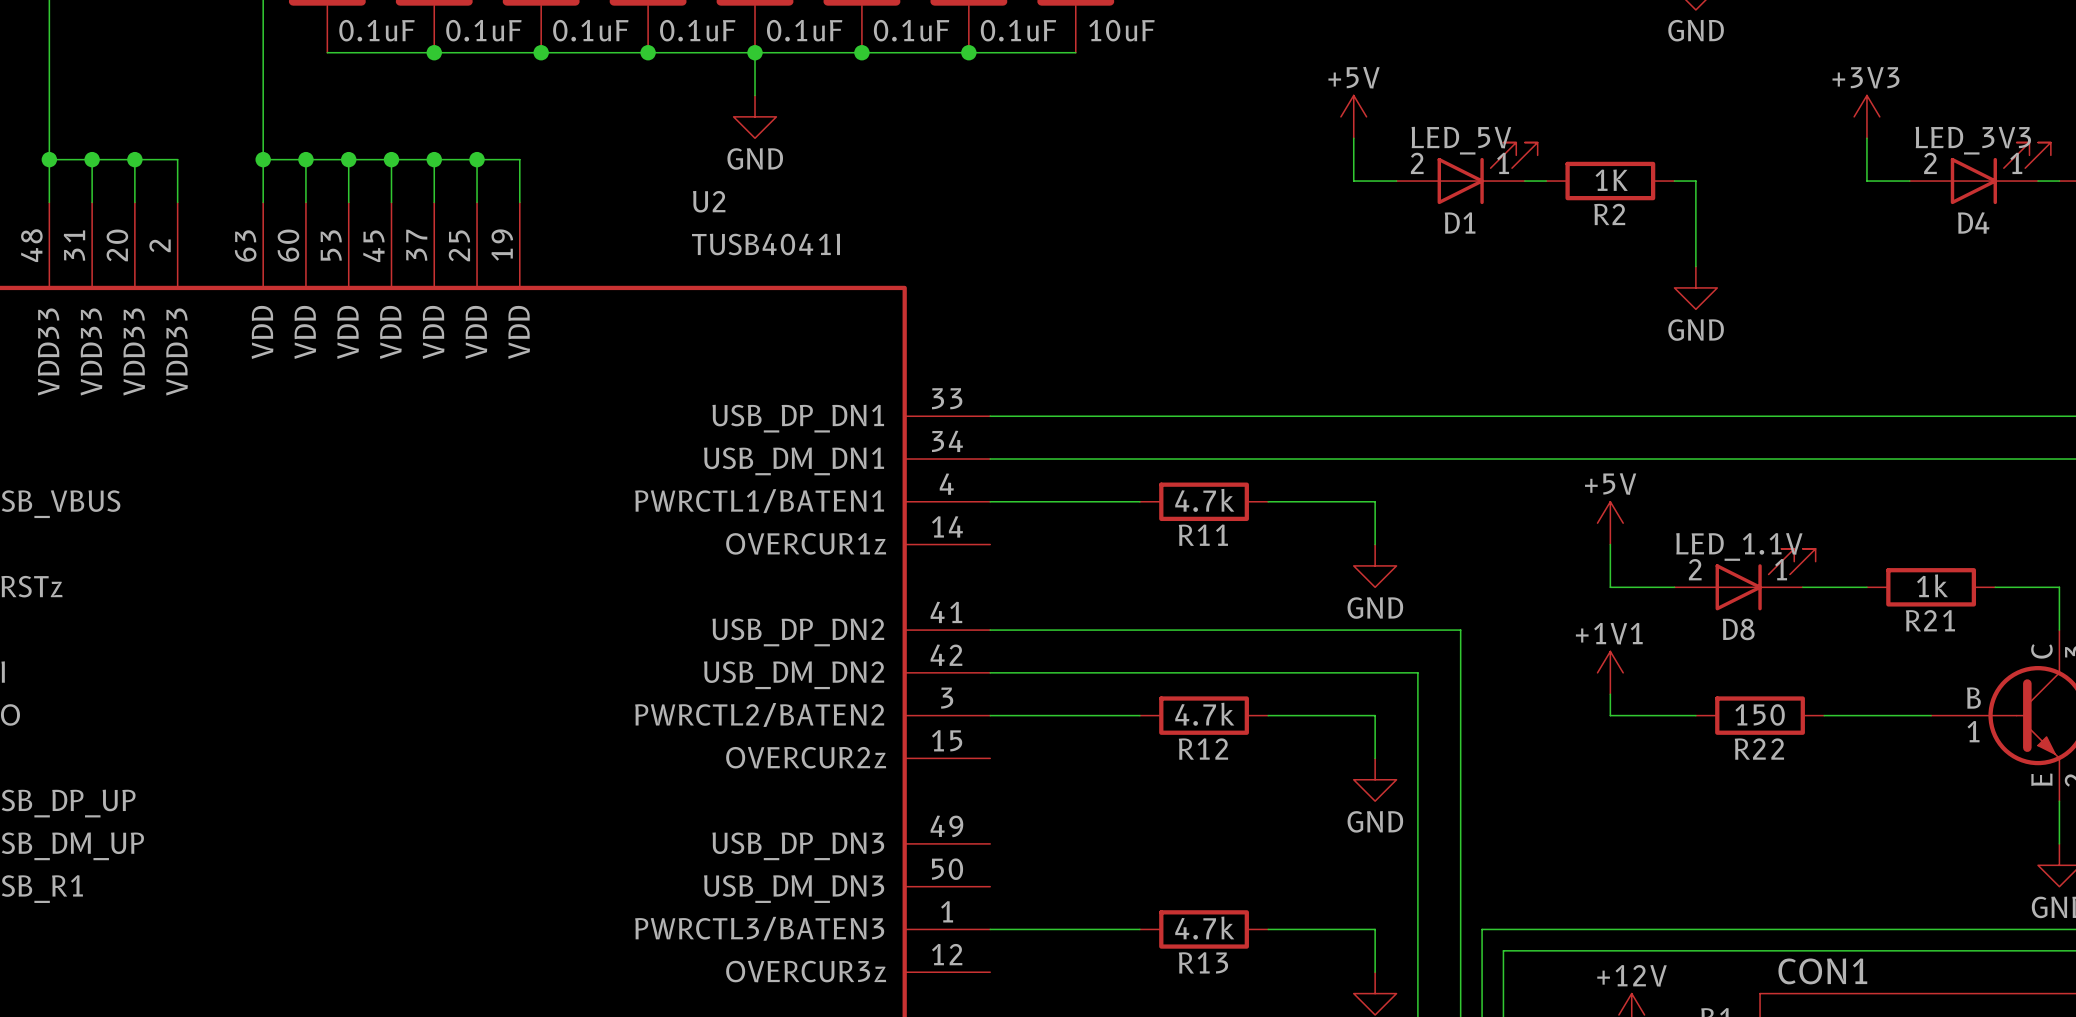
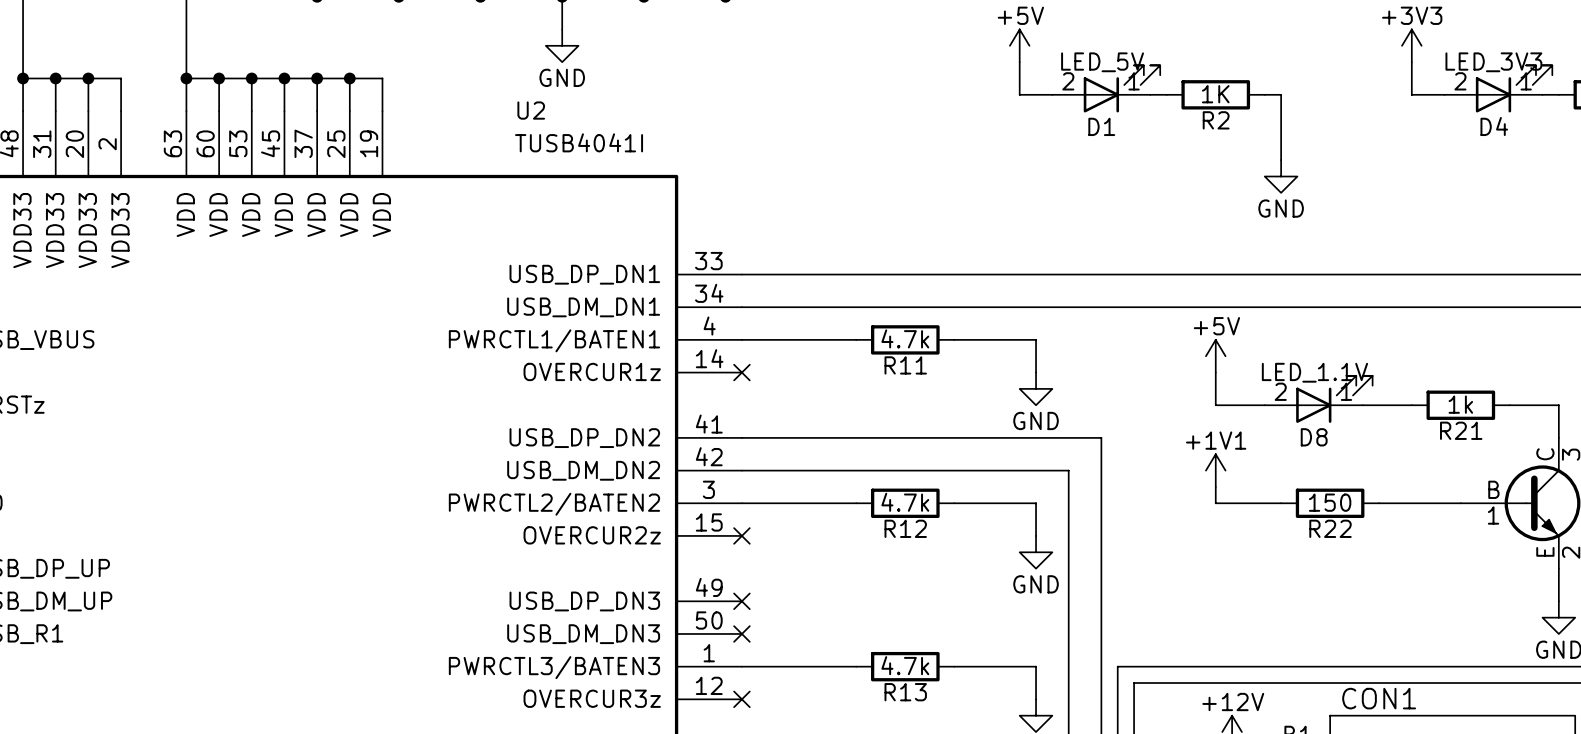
no-connect mark: none -> (741, 372)
no-connect mark: none -> (741, 535)
no-connect mark: none -> (741, 601)
no-connect mark: none -> (741, 633)
no-connect mark: none -> (741, 699)

